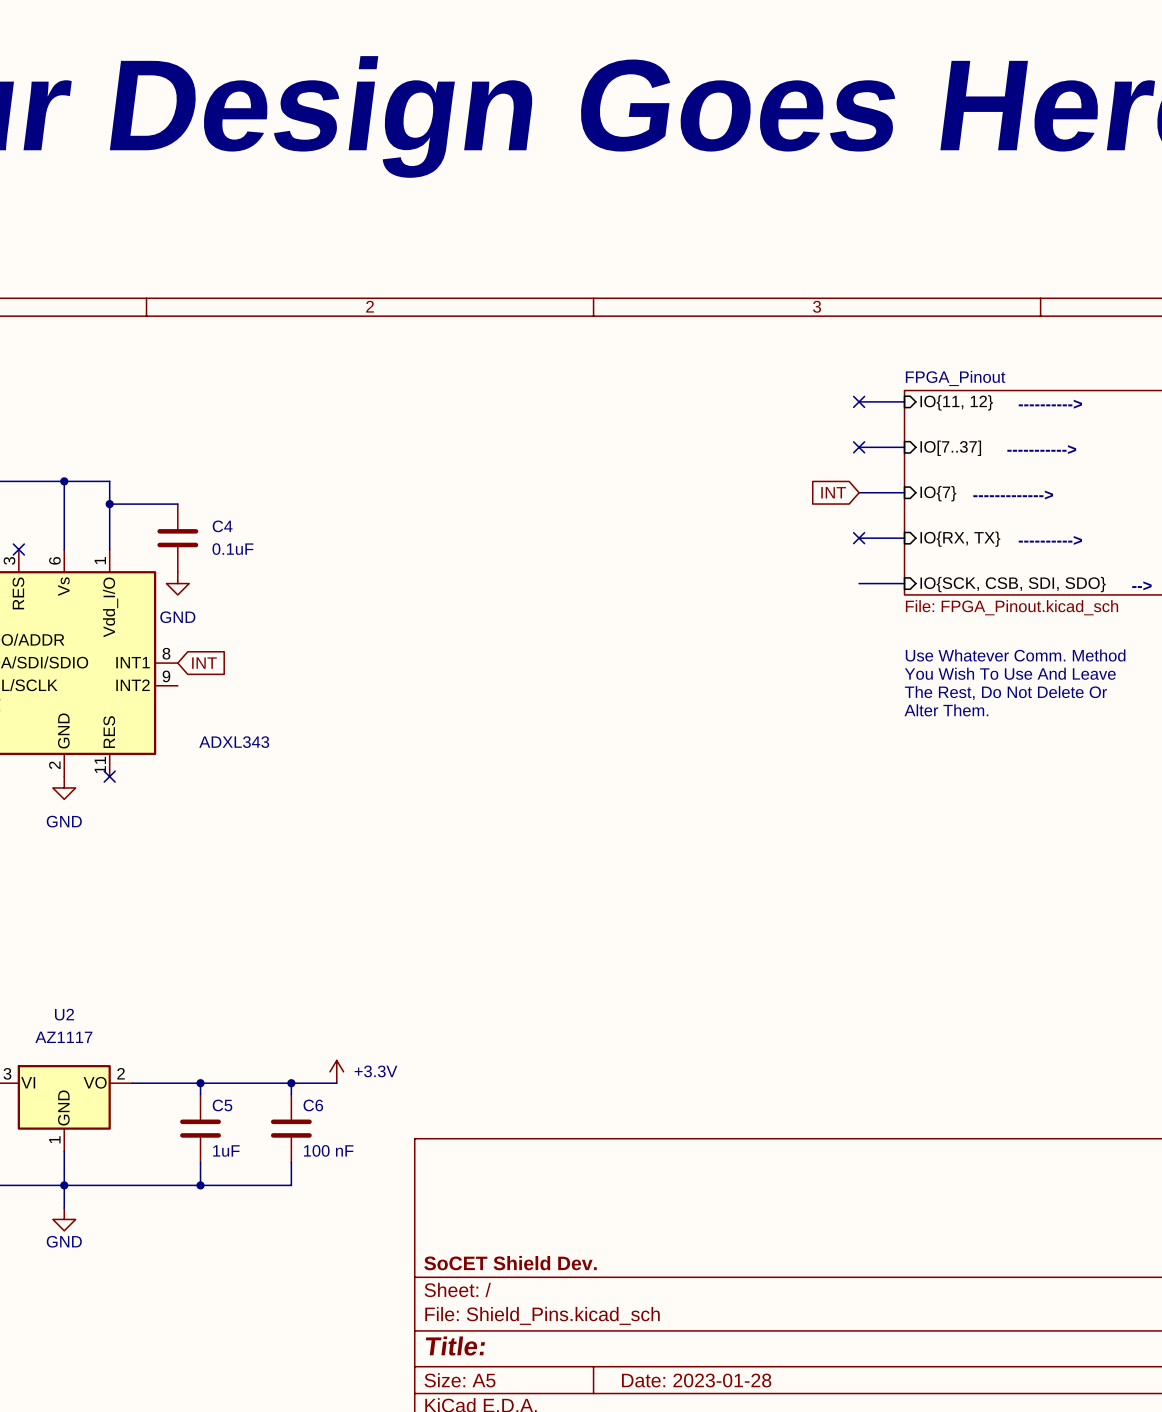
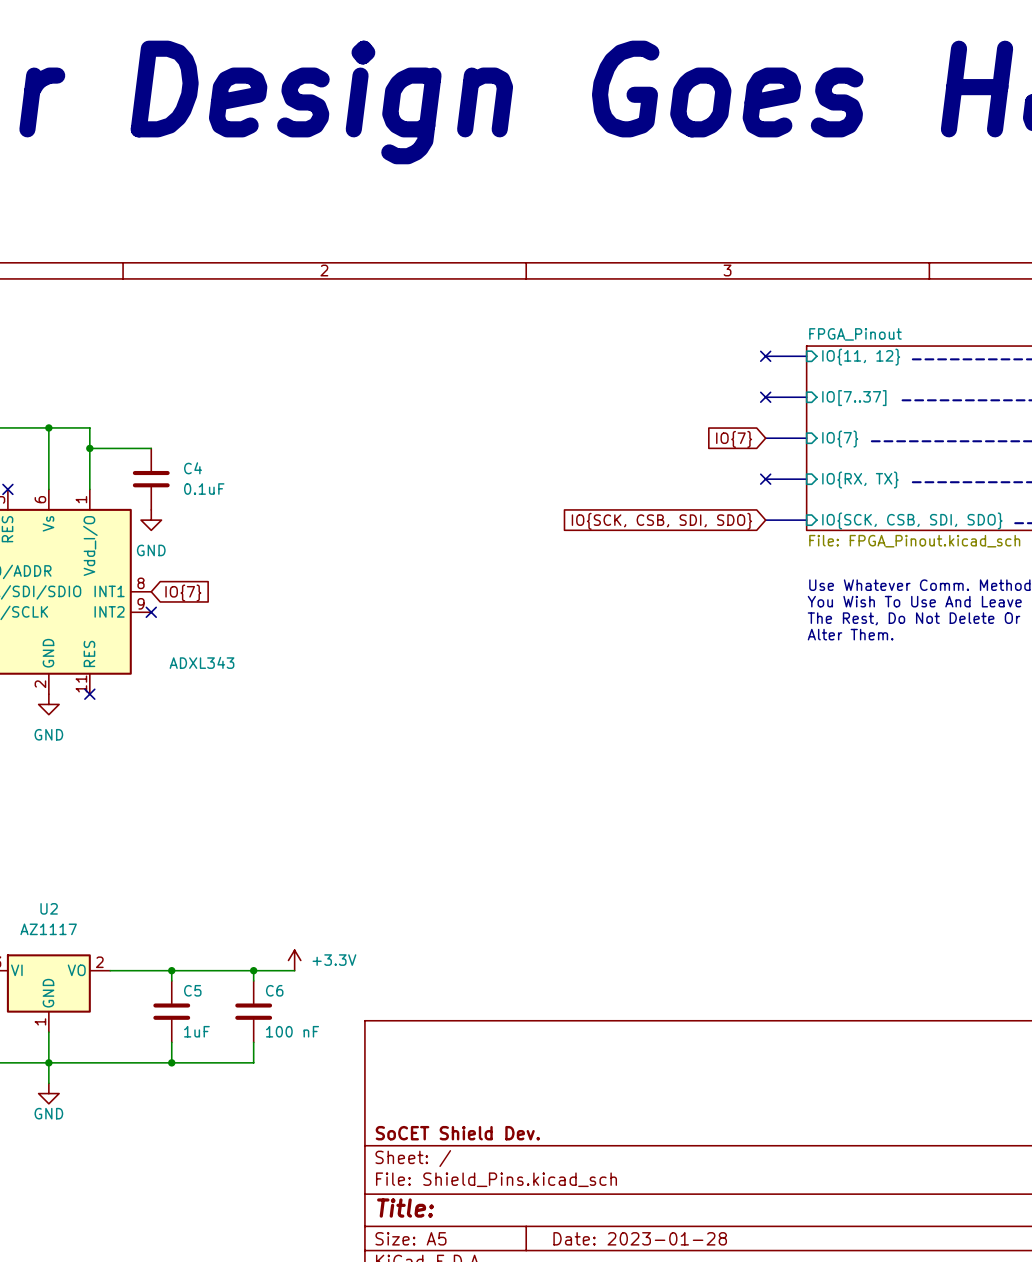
global label: INT (833, 492) -> IO{7} (734, 439)
global label: none -> IO{SCK, CSB, SDI, SDO} (661, 521)
global label: INT (204, 663) -> IO{7} (183, 593)
no-connect mark: none -> (151, 612)

